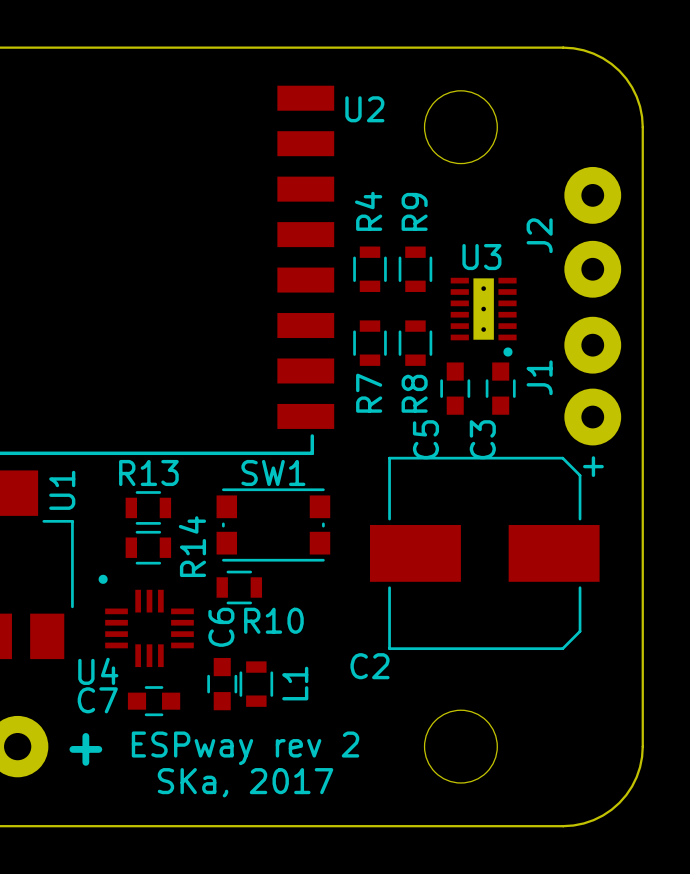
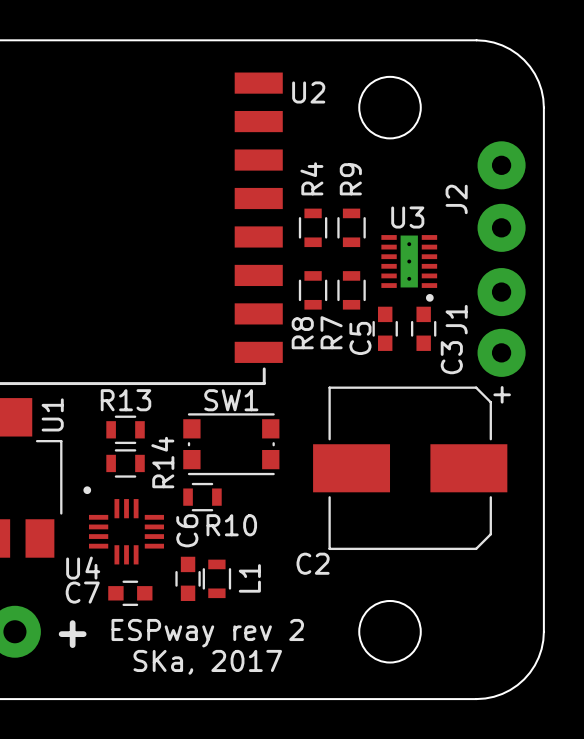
R7 name: R7 (369, 393) -> R8 (302, 333)
R8 name: R8 (414, 393) -> R7 (331, 332)
C5 name position: C5 (425, 439) -> C5 (360, 338)
C3 name position: C3 (482, 439) -> C3 (451, 357)

